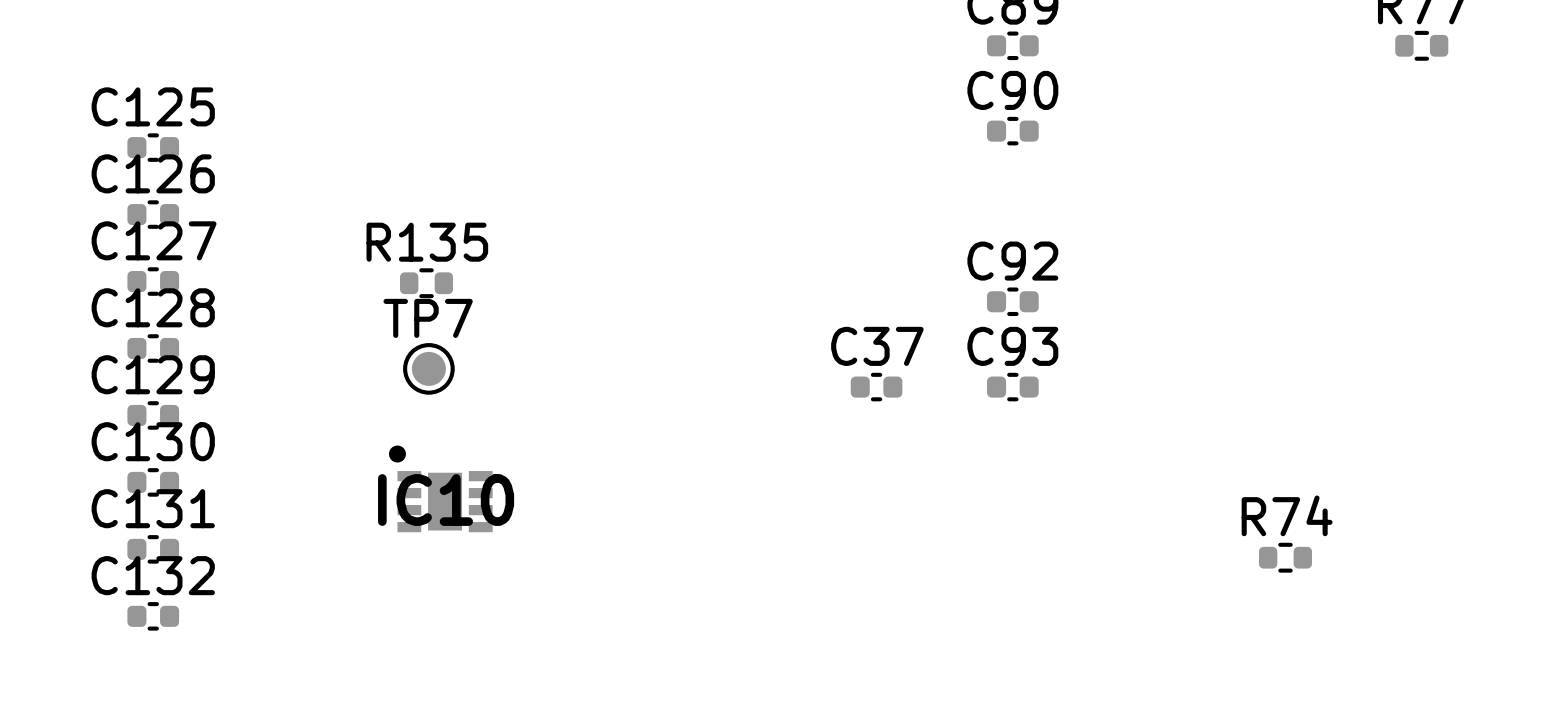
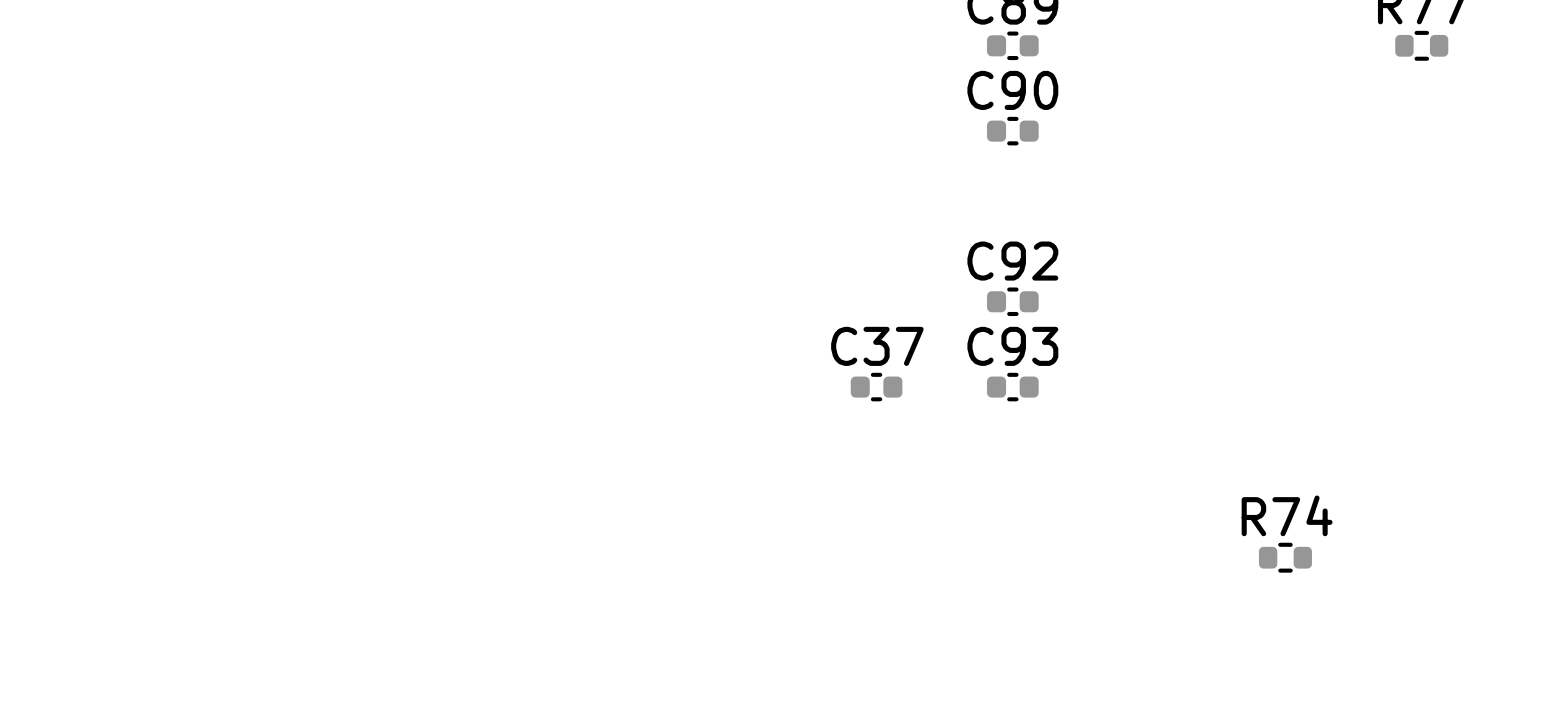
C125: (153, 147) -> none
C126: (153, 214) -> none
C127: (153, 281) -> none
R135: (426, 283) -> none
C128: (153, 348) -> none
TP7: (428, 368) -> none
C129: (153, 415) -> none
C130: (153, 482) -> none
IC10: (440, 488) -> none
C131: (153, 549) -> none
C132: (153, 616) -> none

